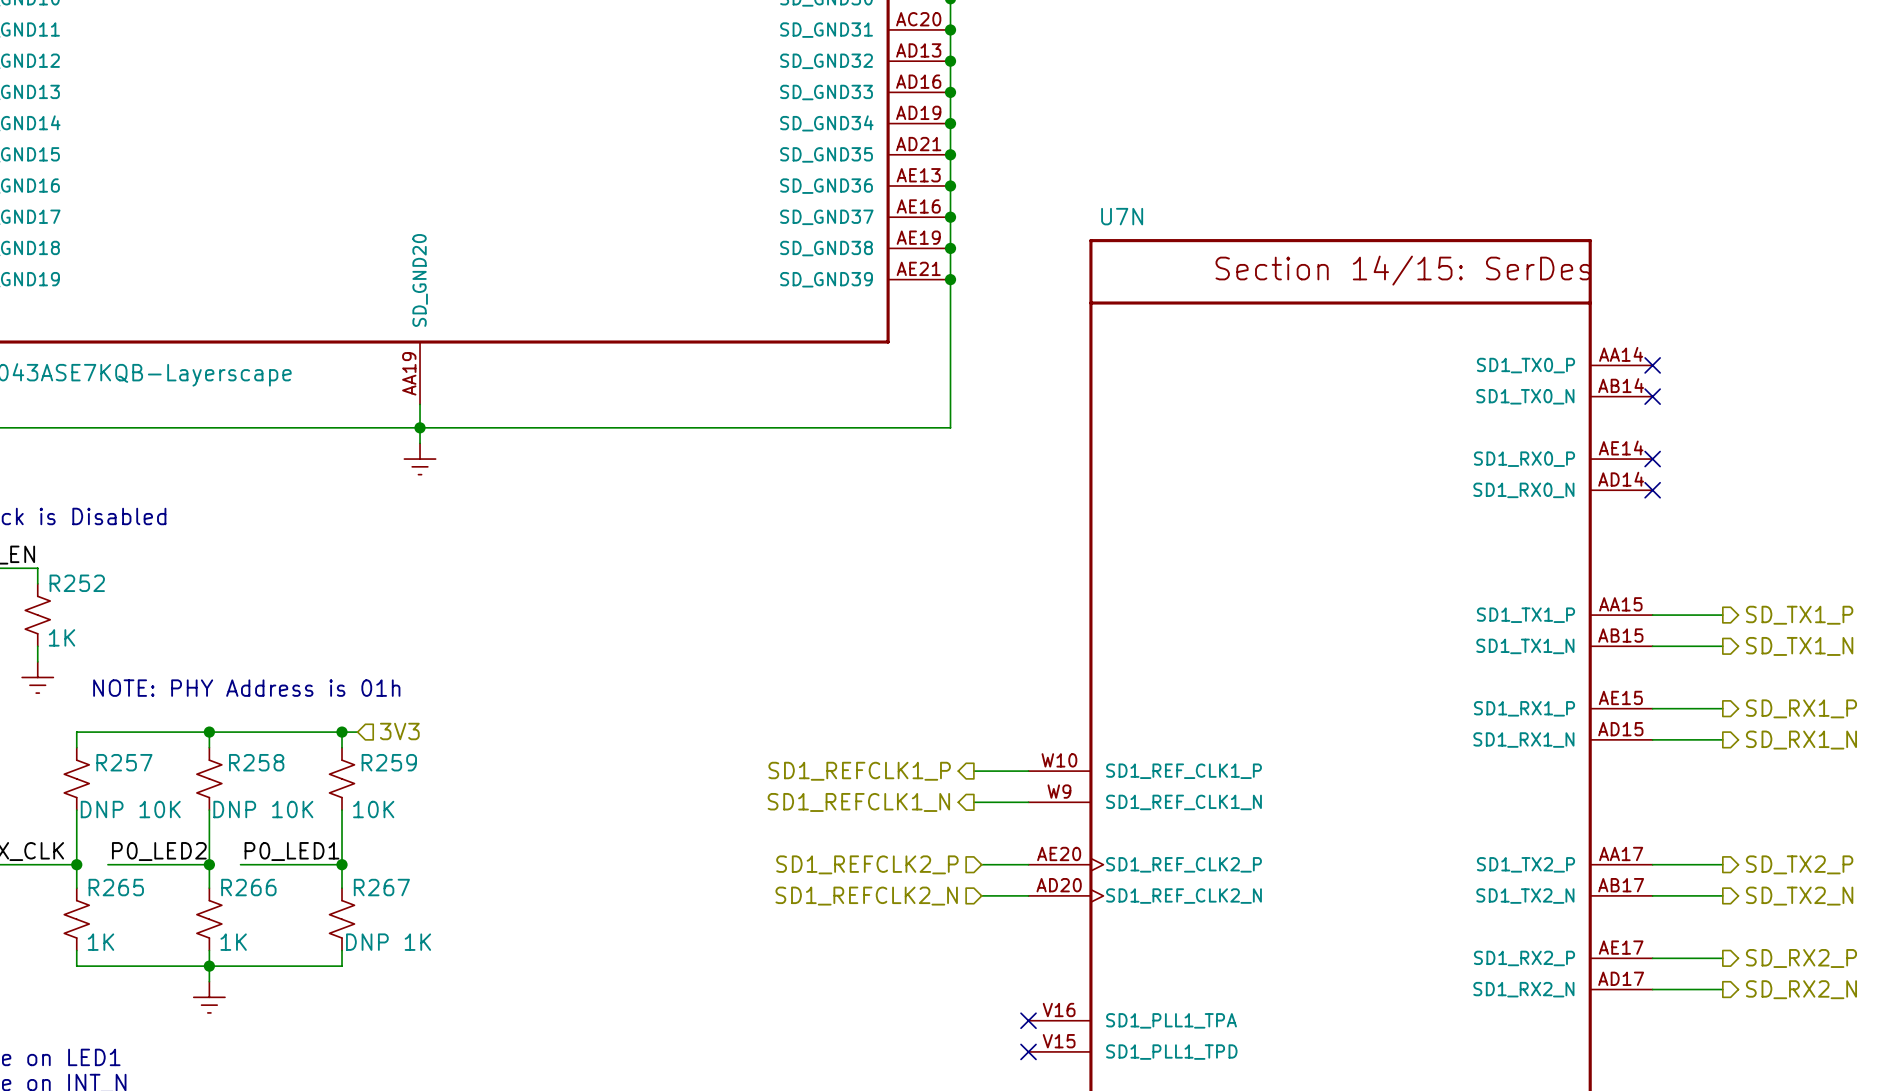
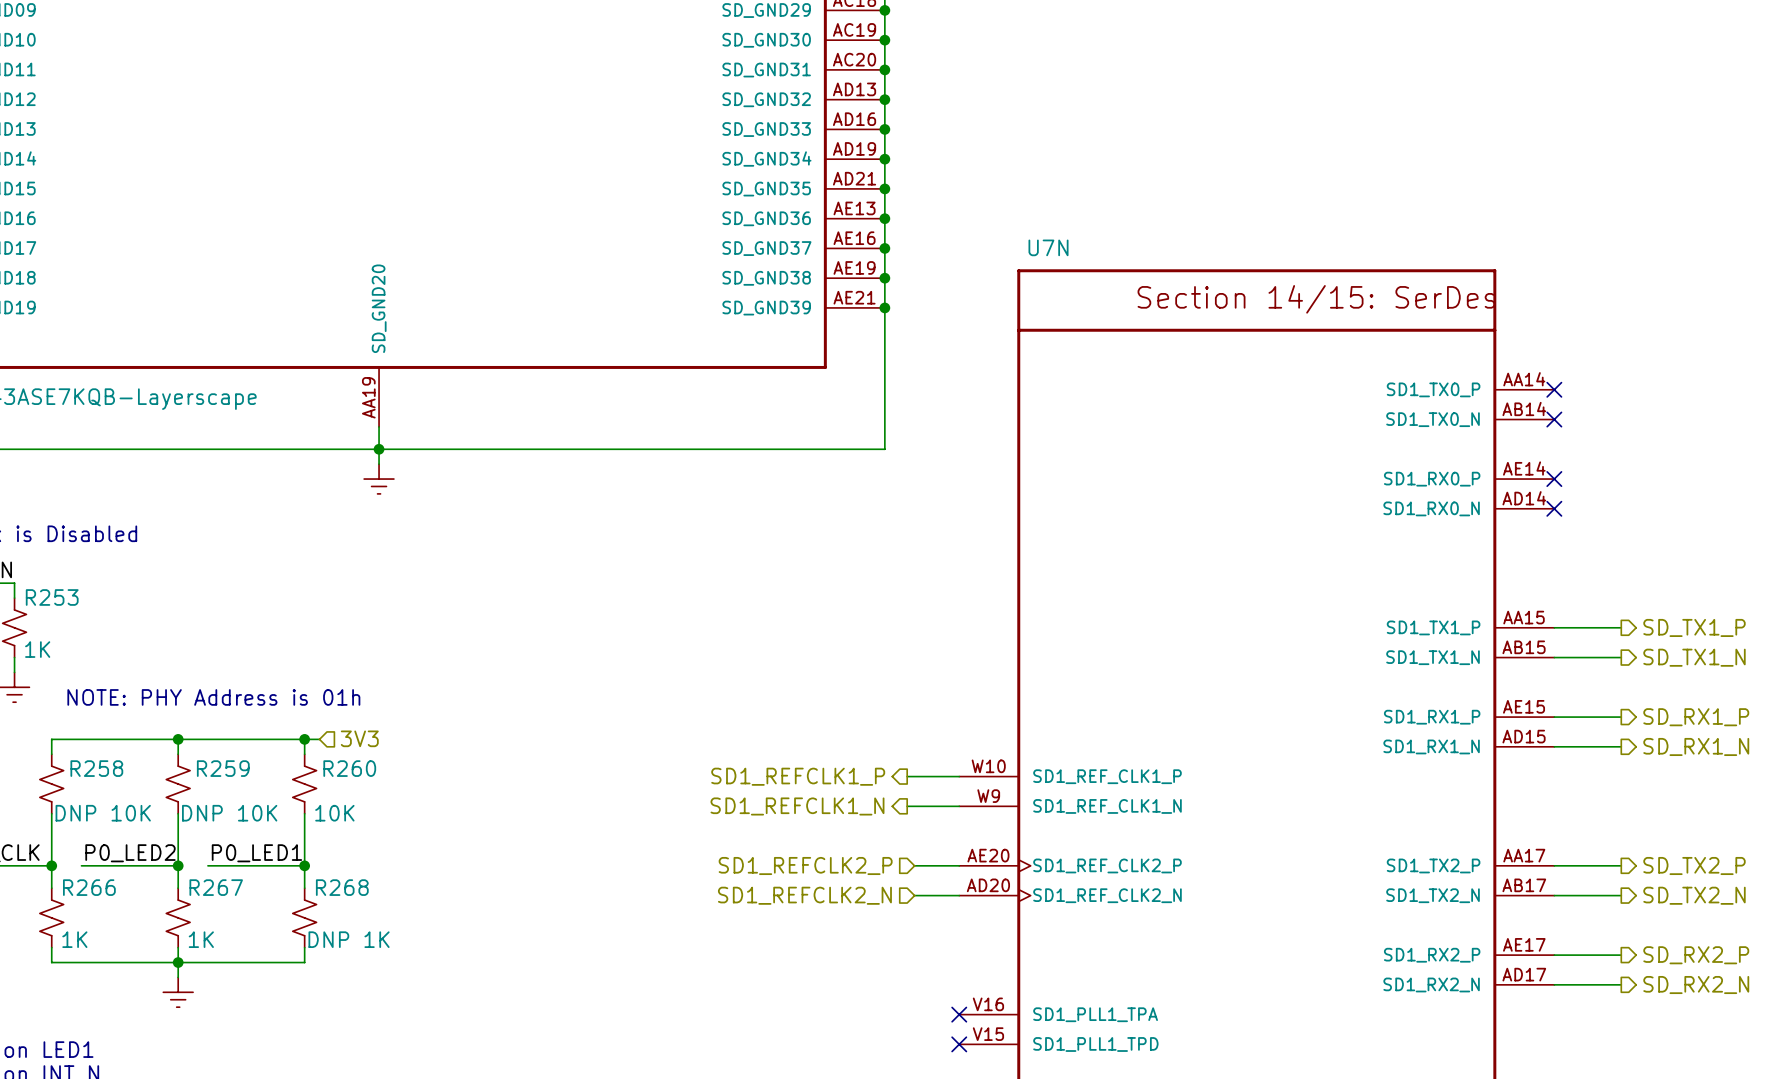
R252 name: R252 (77, 583) -> R253 (52, 597)
R257 name: R257 (124, 762) -> R258 (96, 768)
R258 name: R258 (256, 762) -> R259 (223, 768)
R259 name: R259 (389, 762) -> R260 (349, 768)
R265 name: R265 (116, 887) -> R266 (89, 887)
R266 name: R266 (248, 887) -> R267 (216, 887)
R267 name: R267 (381, 887) -> R268 (342, 887)

